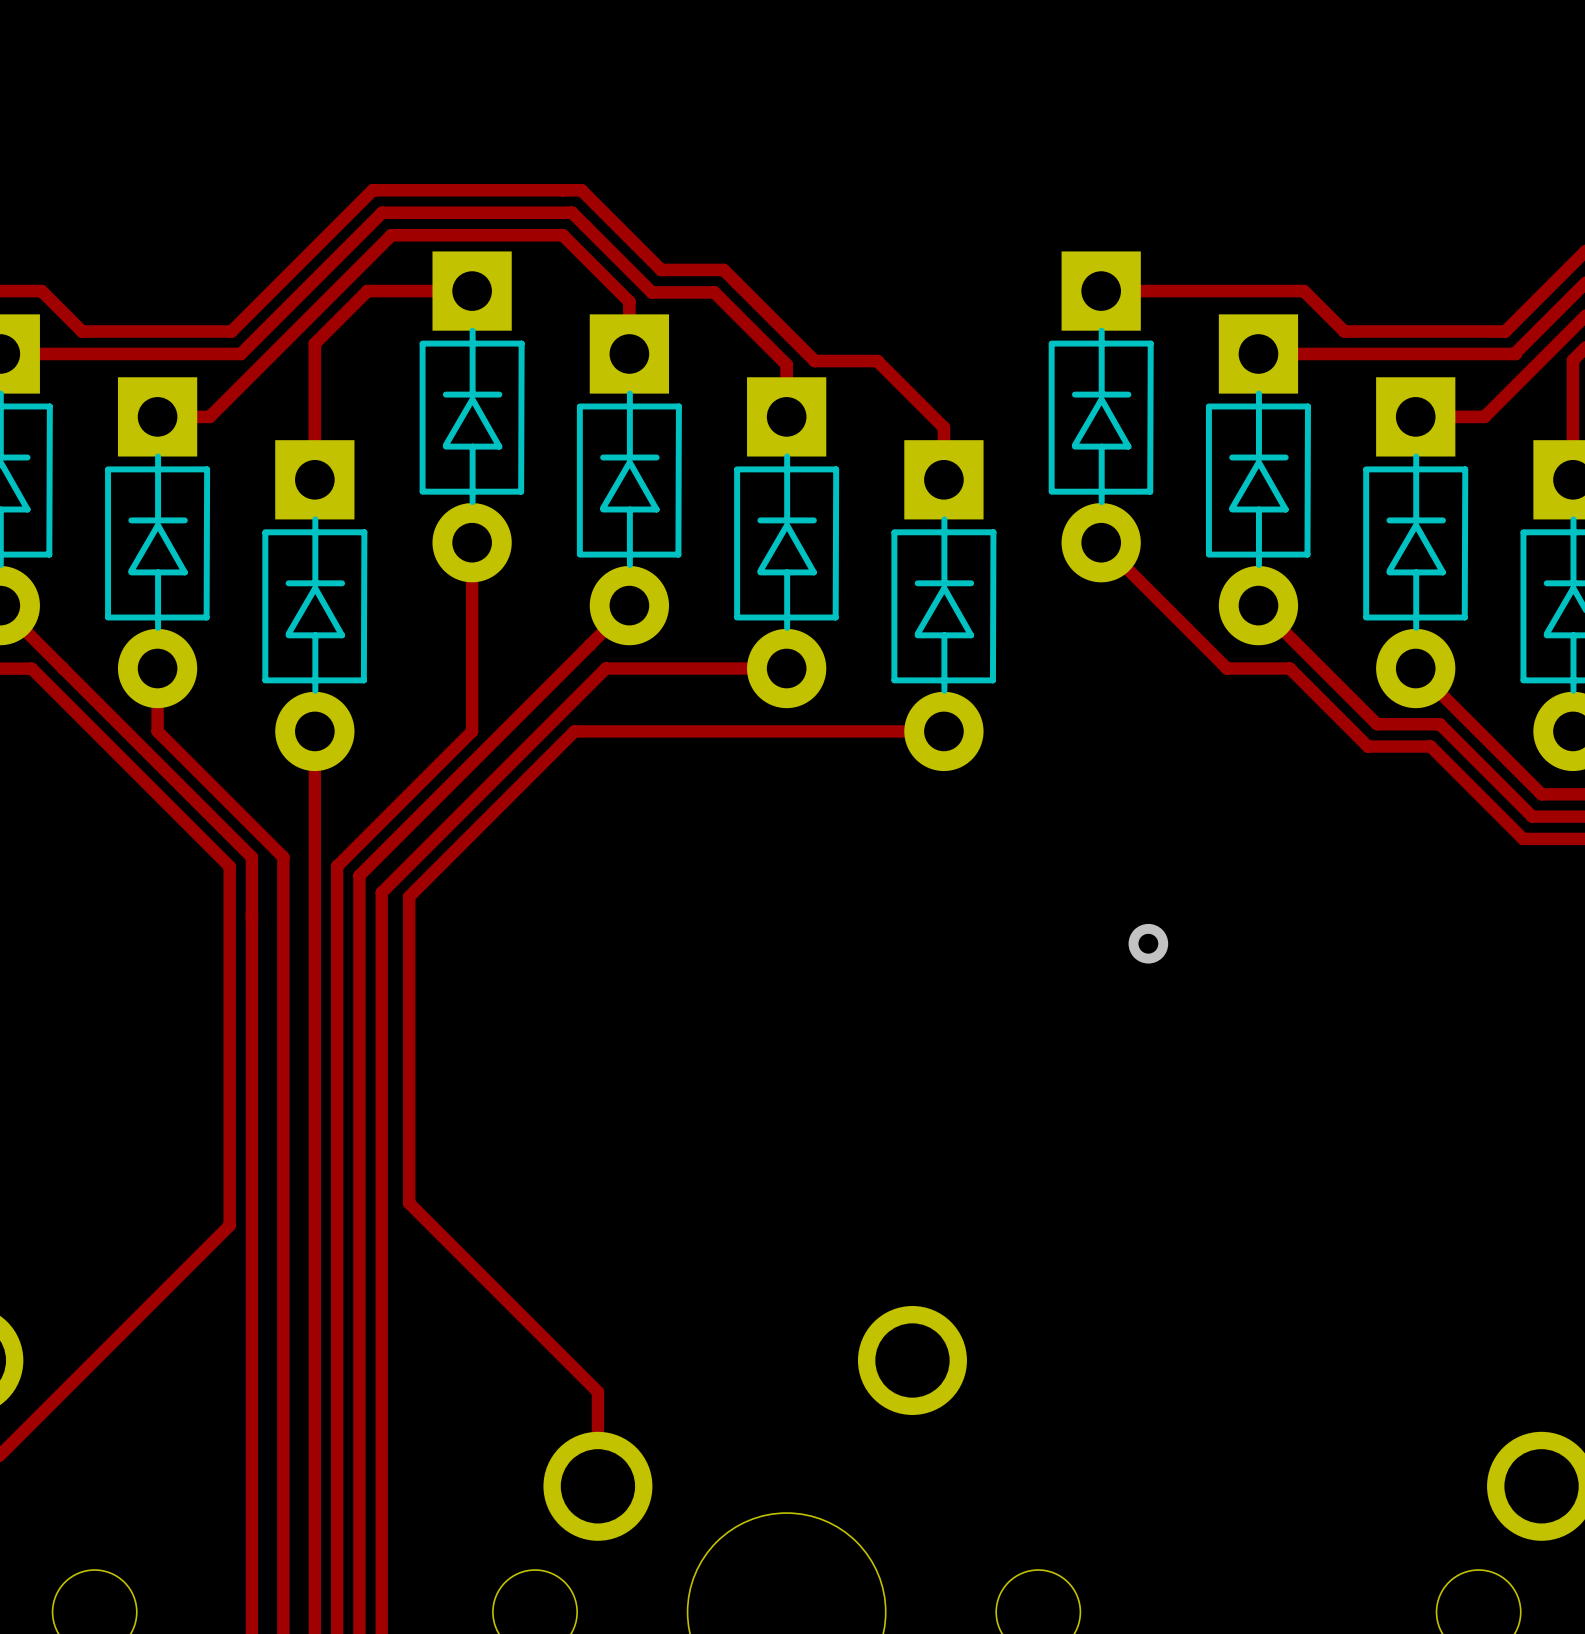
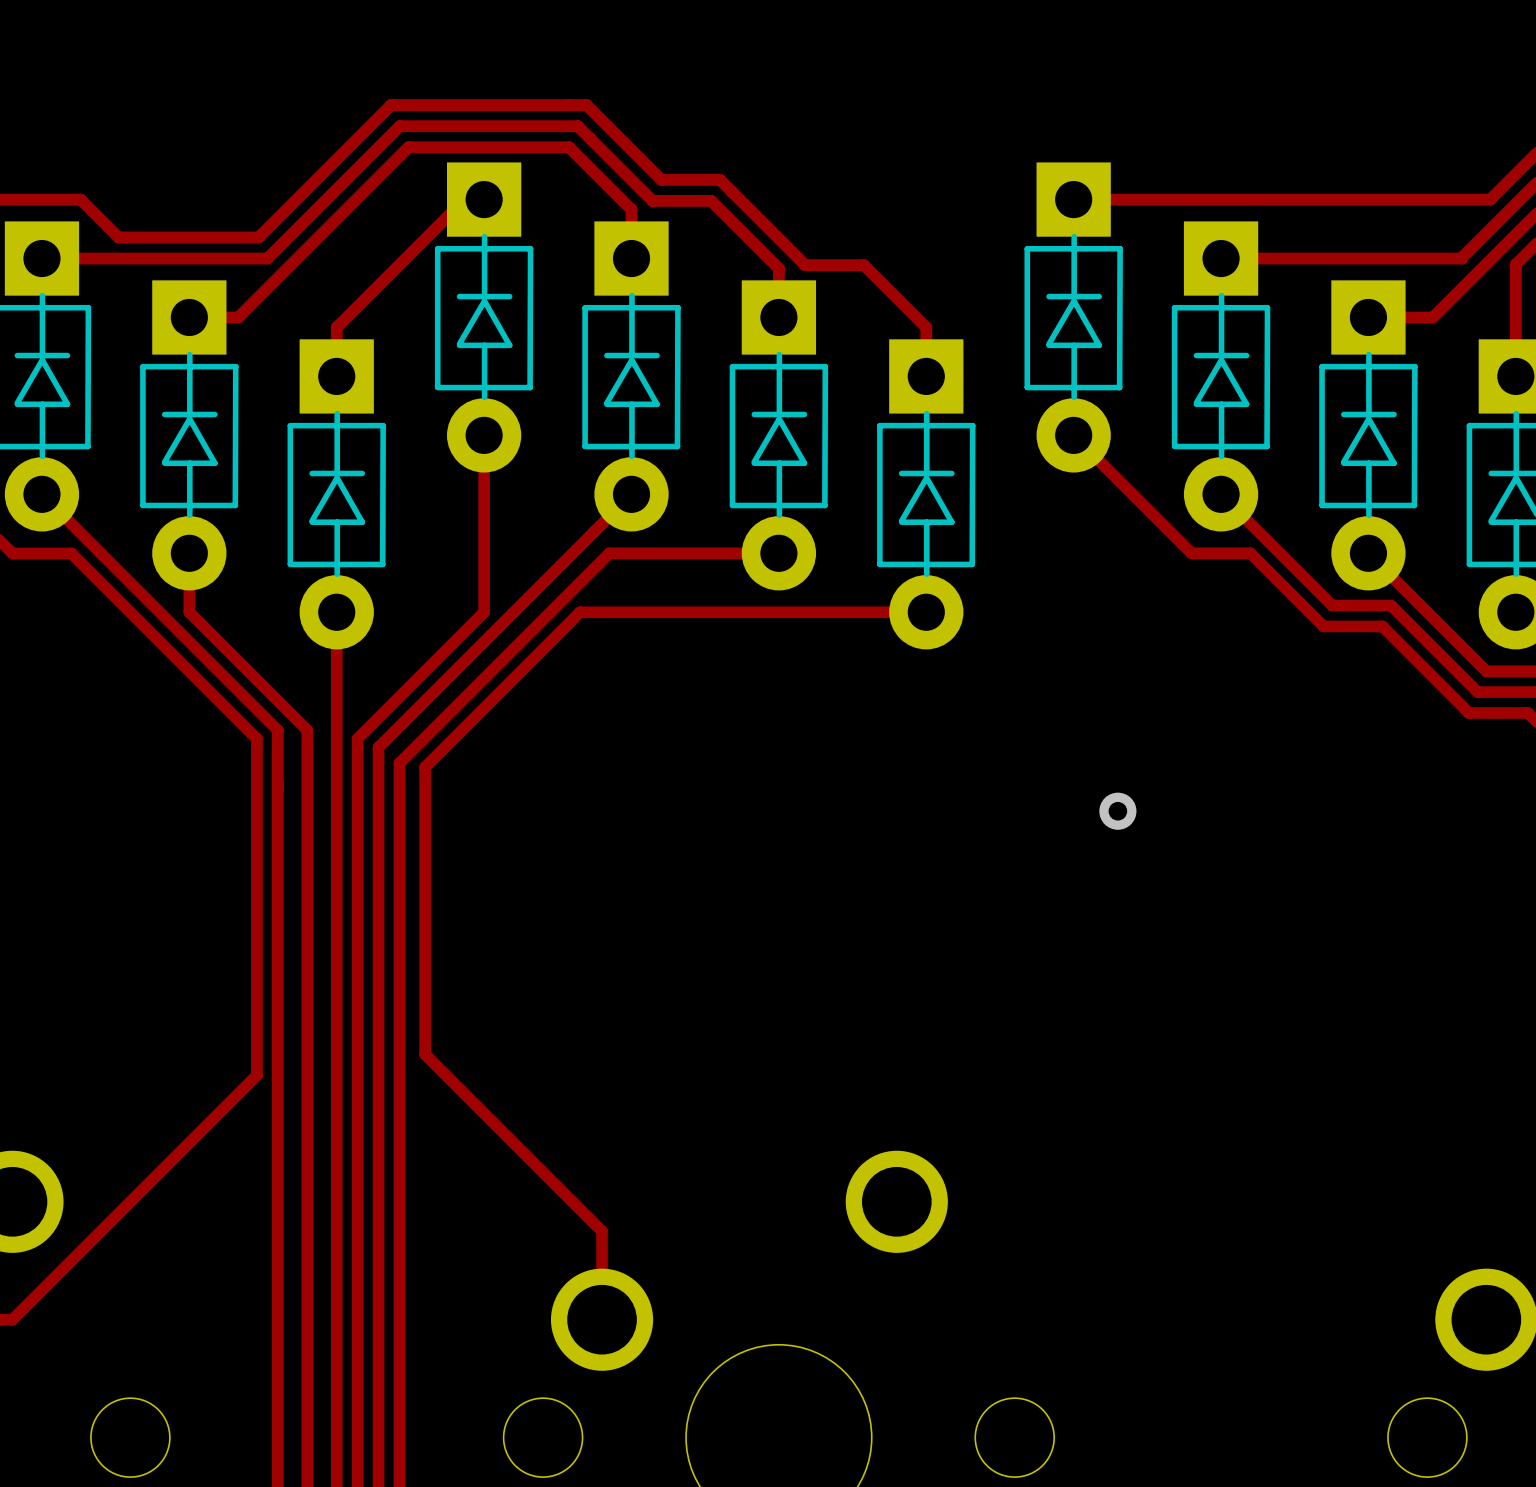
track: (451, 291) (367, 291) (314, 343) (314, 427) -> (464, 199) (336, 327)
track: (1303, 291) (1344, 331) (1505, 331) (1545, 291) -> (1263, 199) (1490, 199)

